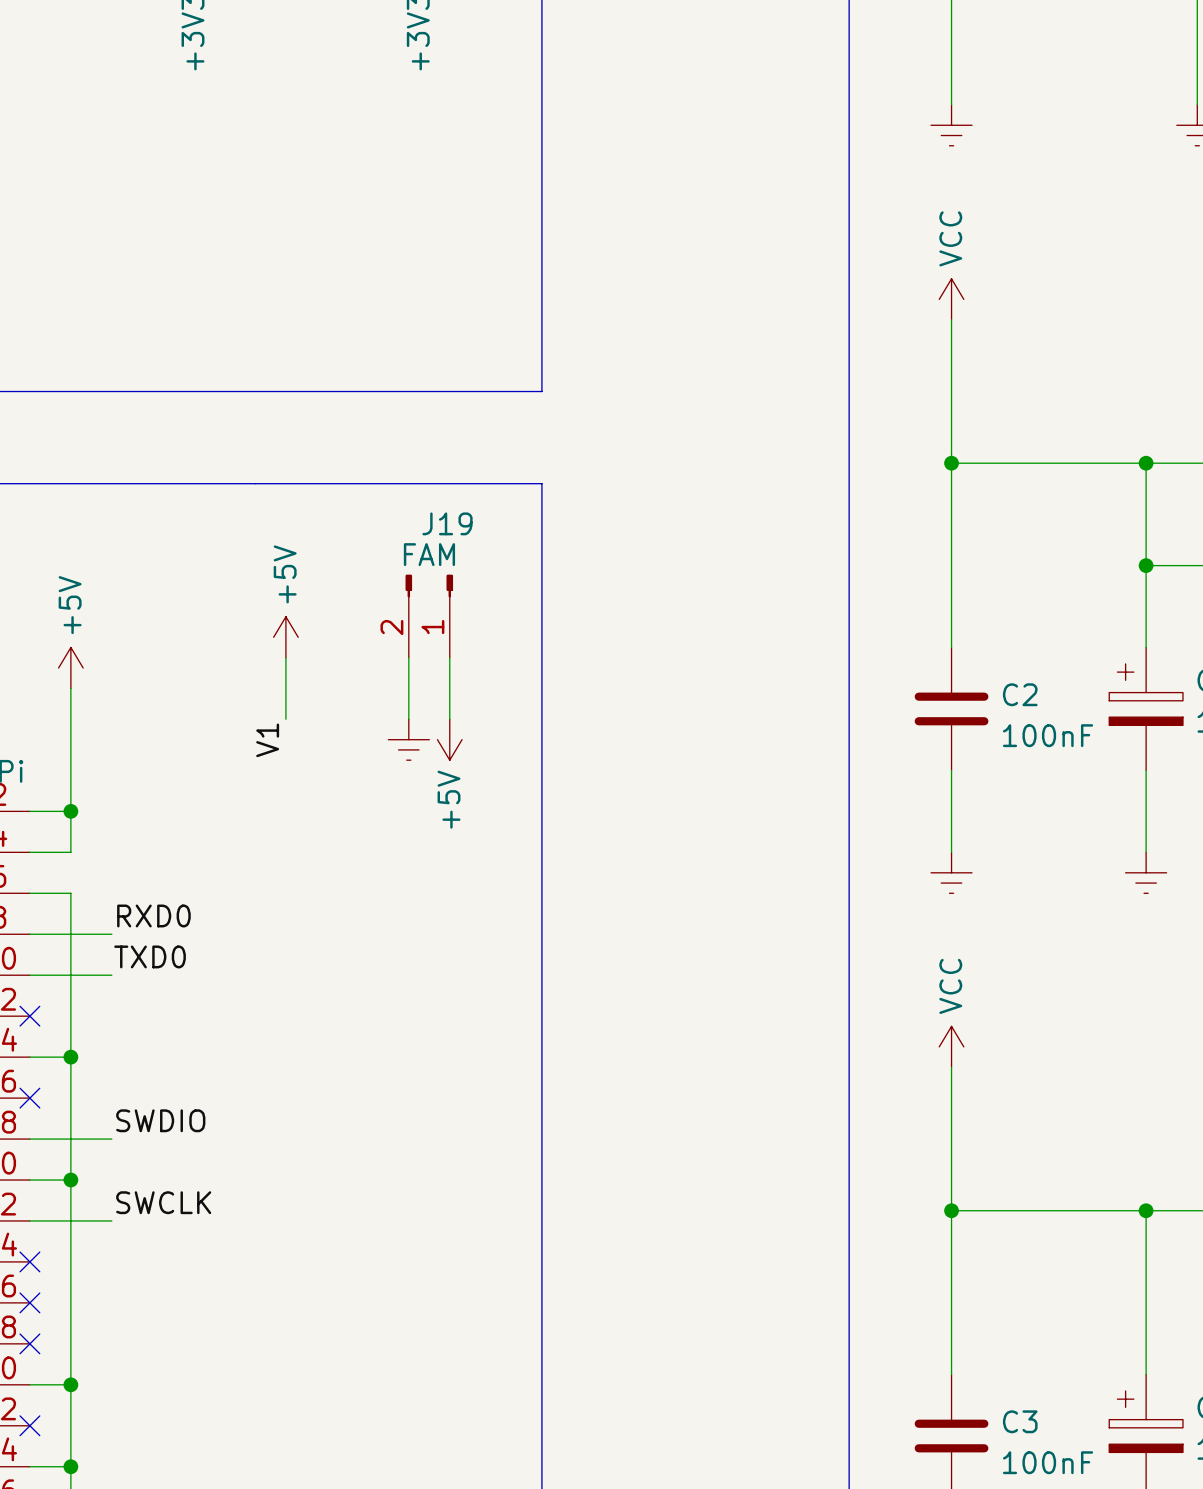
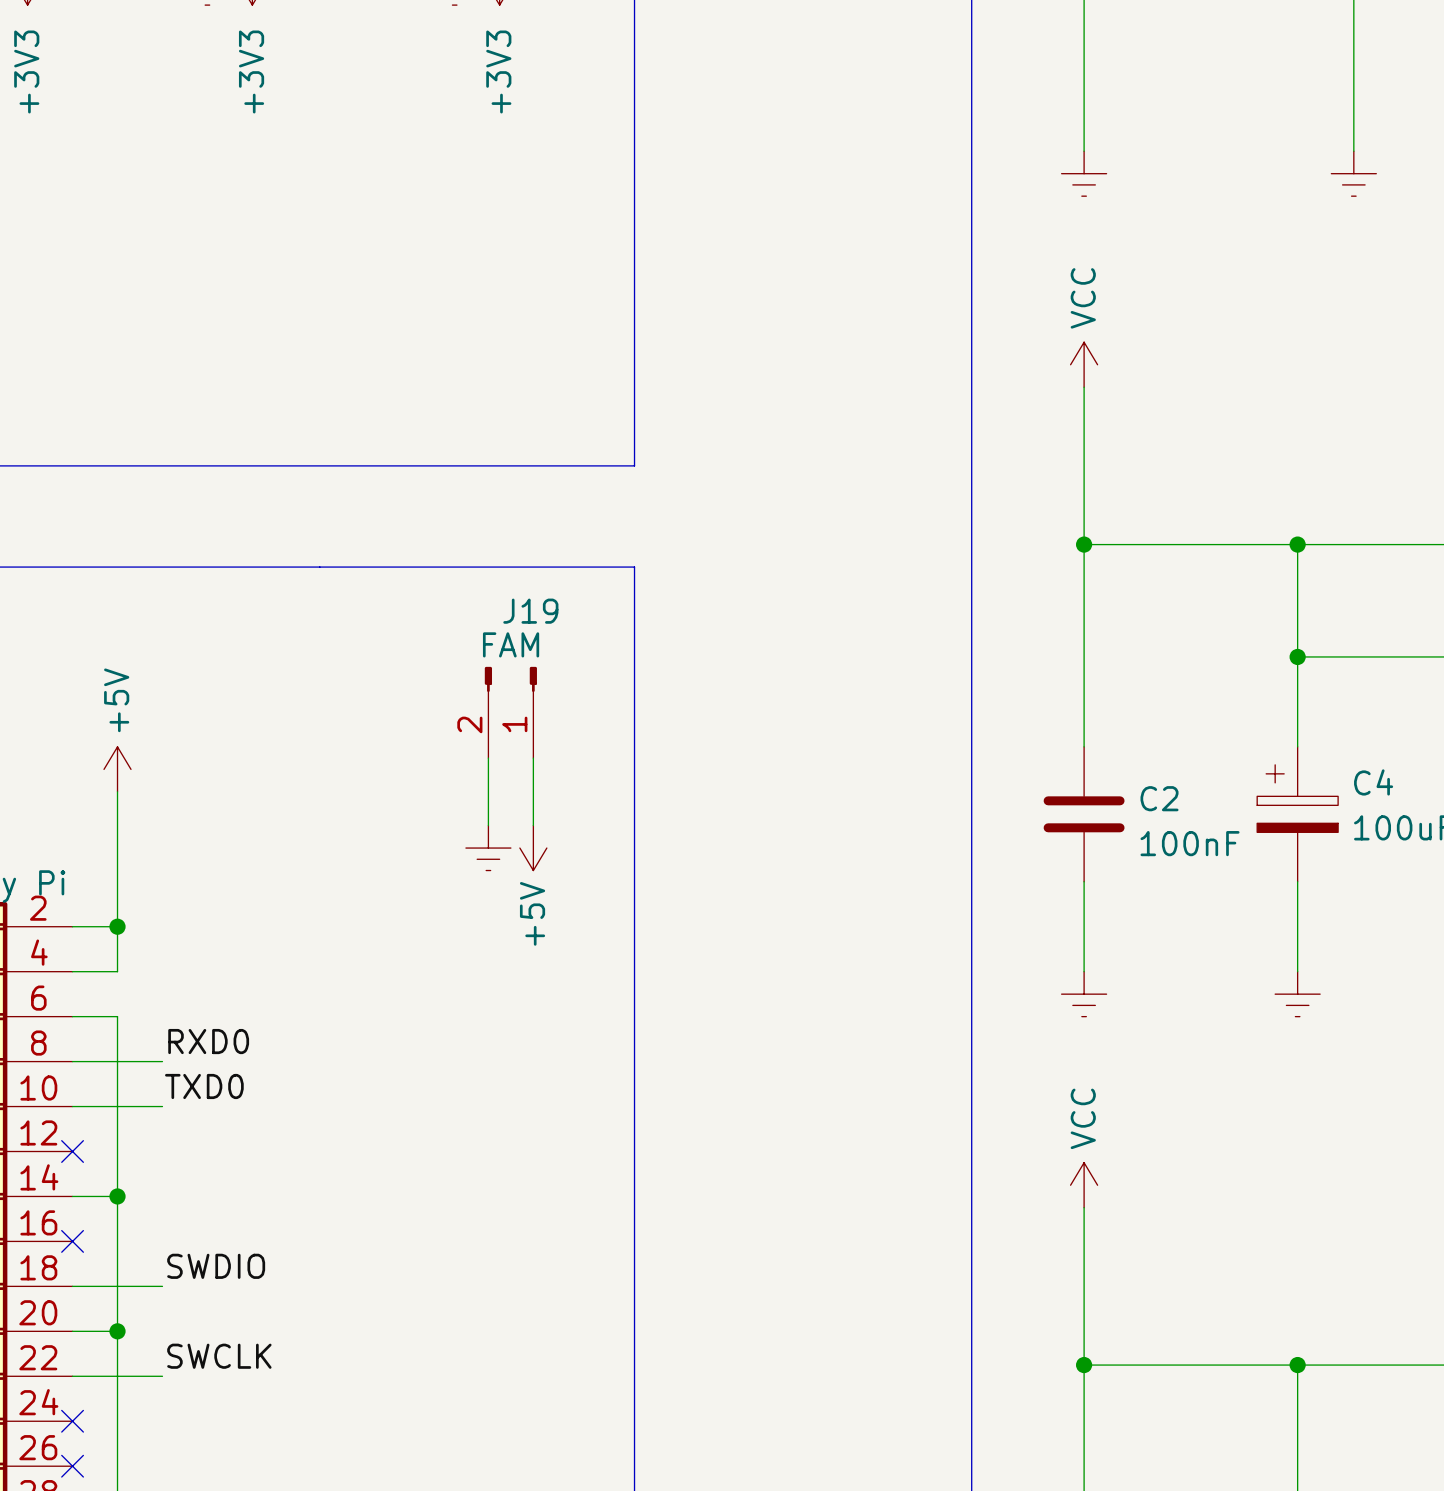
power symbol: +5V (285, 637) -> none
wire: (285, 657) (285, 719) -> none
label: V1 (267, 740) -> none

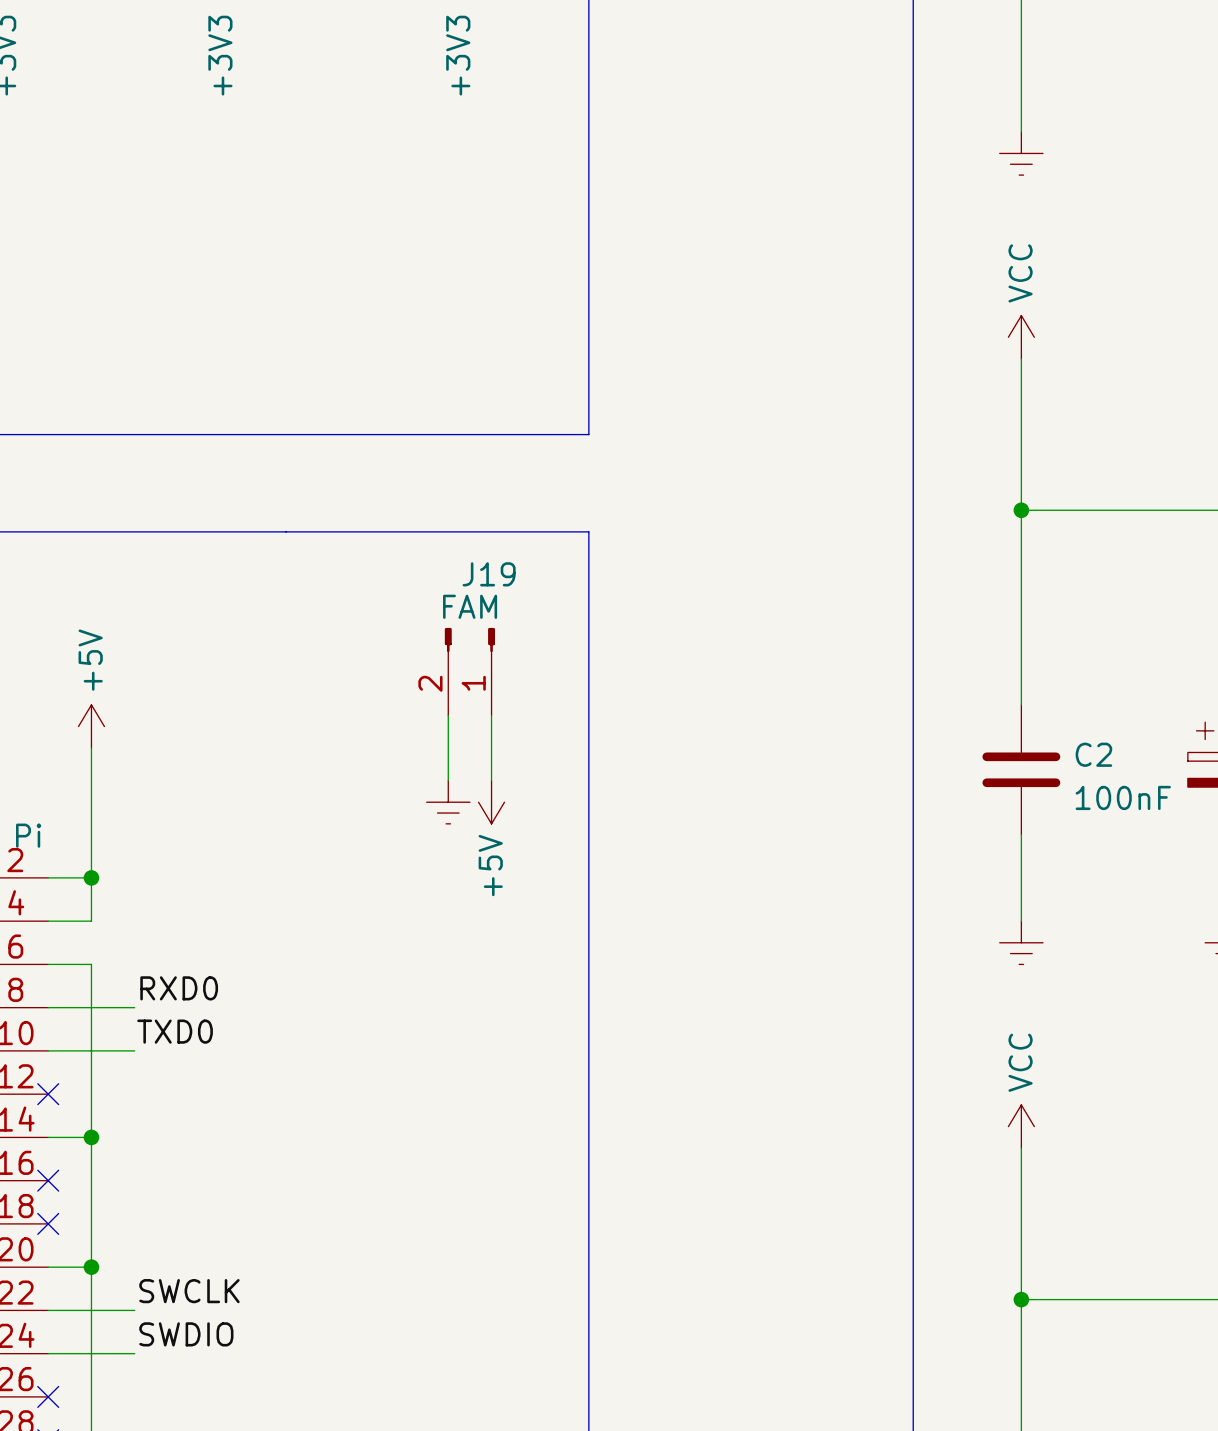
label position: SWDIO (216, 1266) -> SWDIO (186, 1334)
wire: (72, 1286) (162, 1286) -> (48, 1353) (134, 1353)
no-connect mark: none -> (48, 1223)
no-connect mark: (72, 1421) -> none

